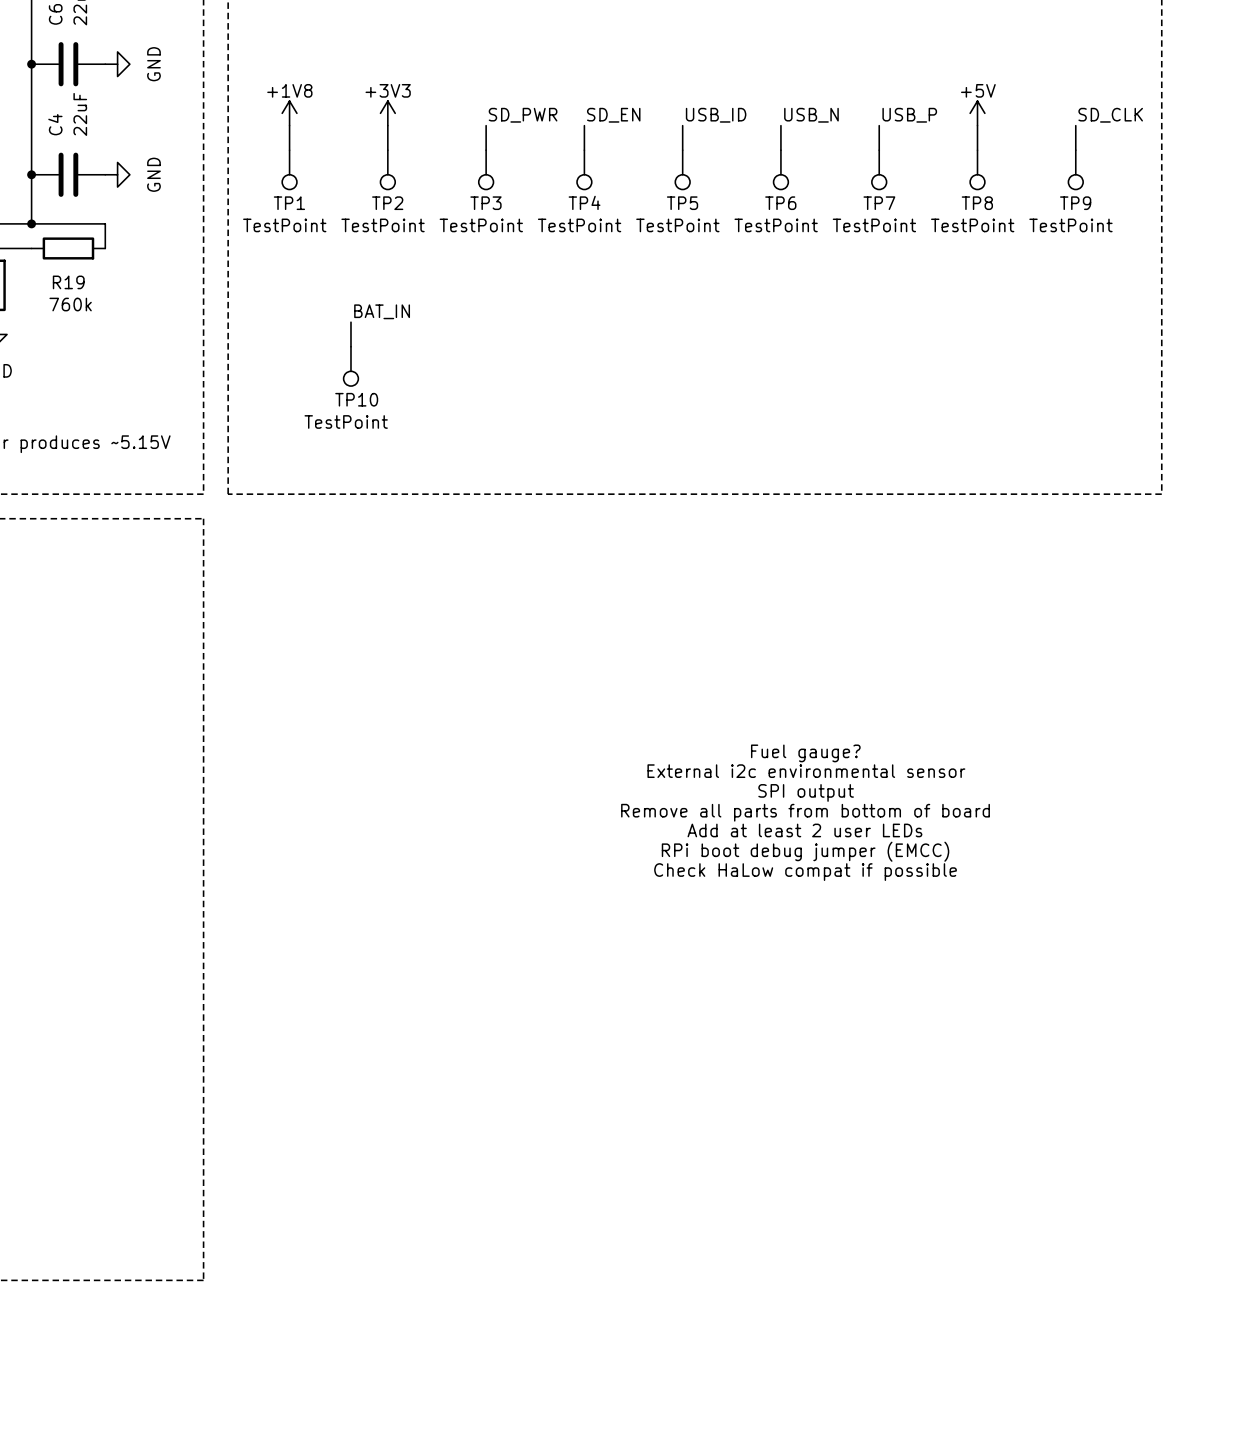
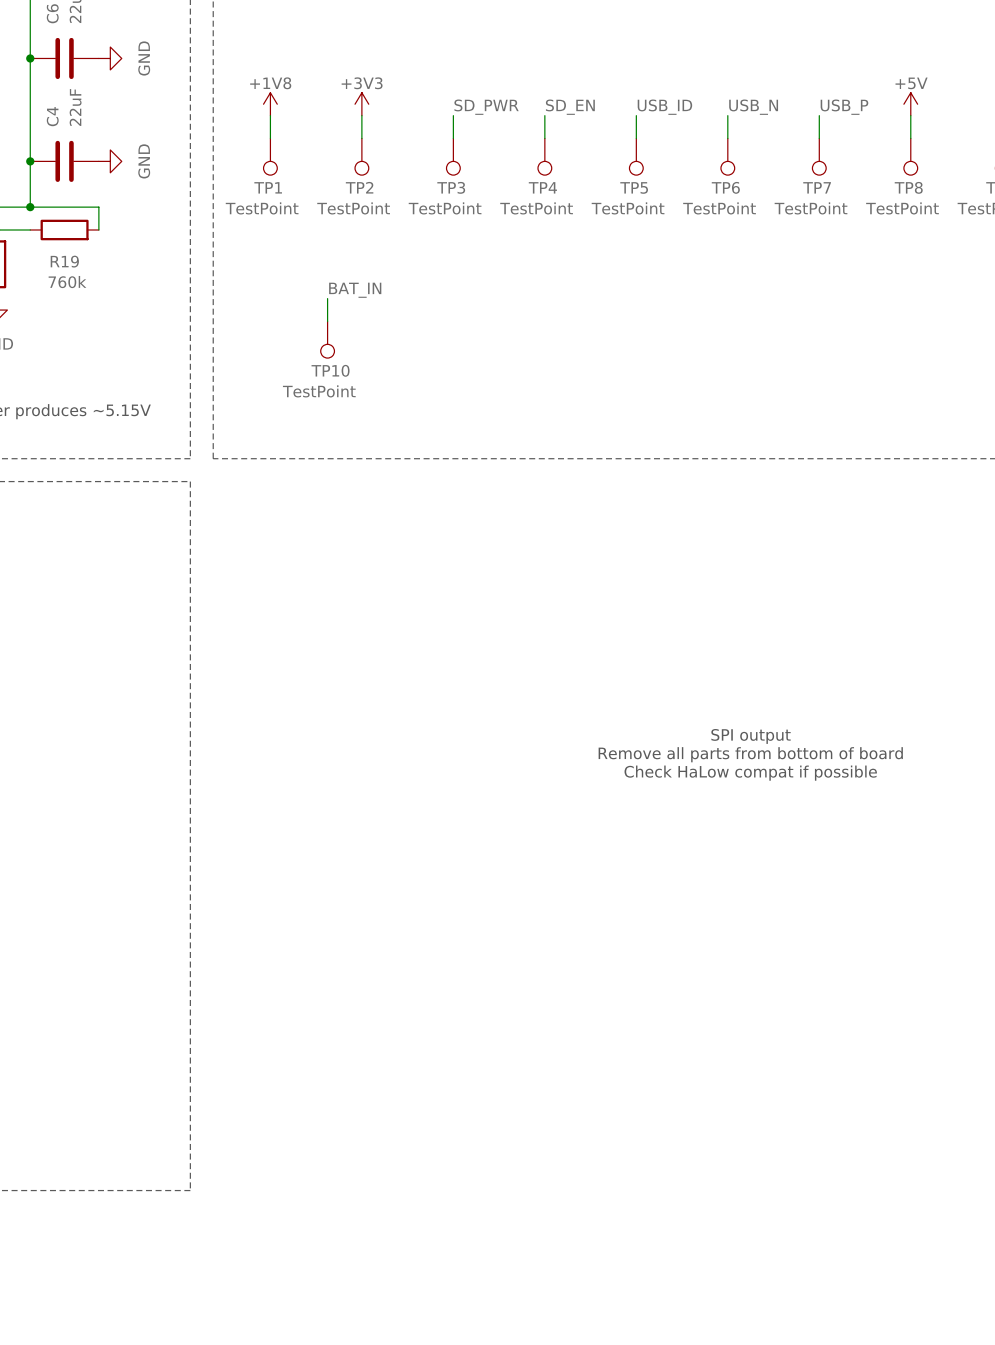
text: Fuel gauge? (805, 753) -> none
text: External i2c environmental sensor (806, 771) -> none
text: Add at least 2 user LEDs (804, 830) -> Check HaLow compat if possible (750, 773)
text: RPi boot debug jumper (EMCC) (805, 851) -> none
text: Check HaLow compat if possible (805, 872) -> none

